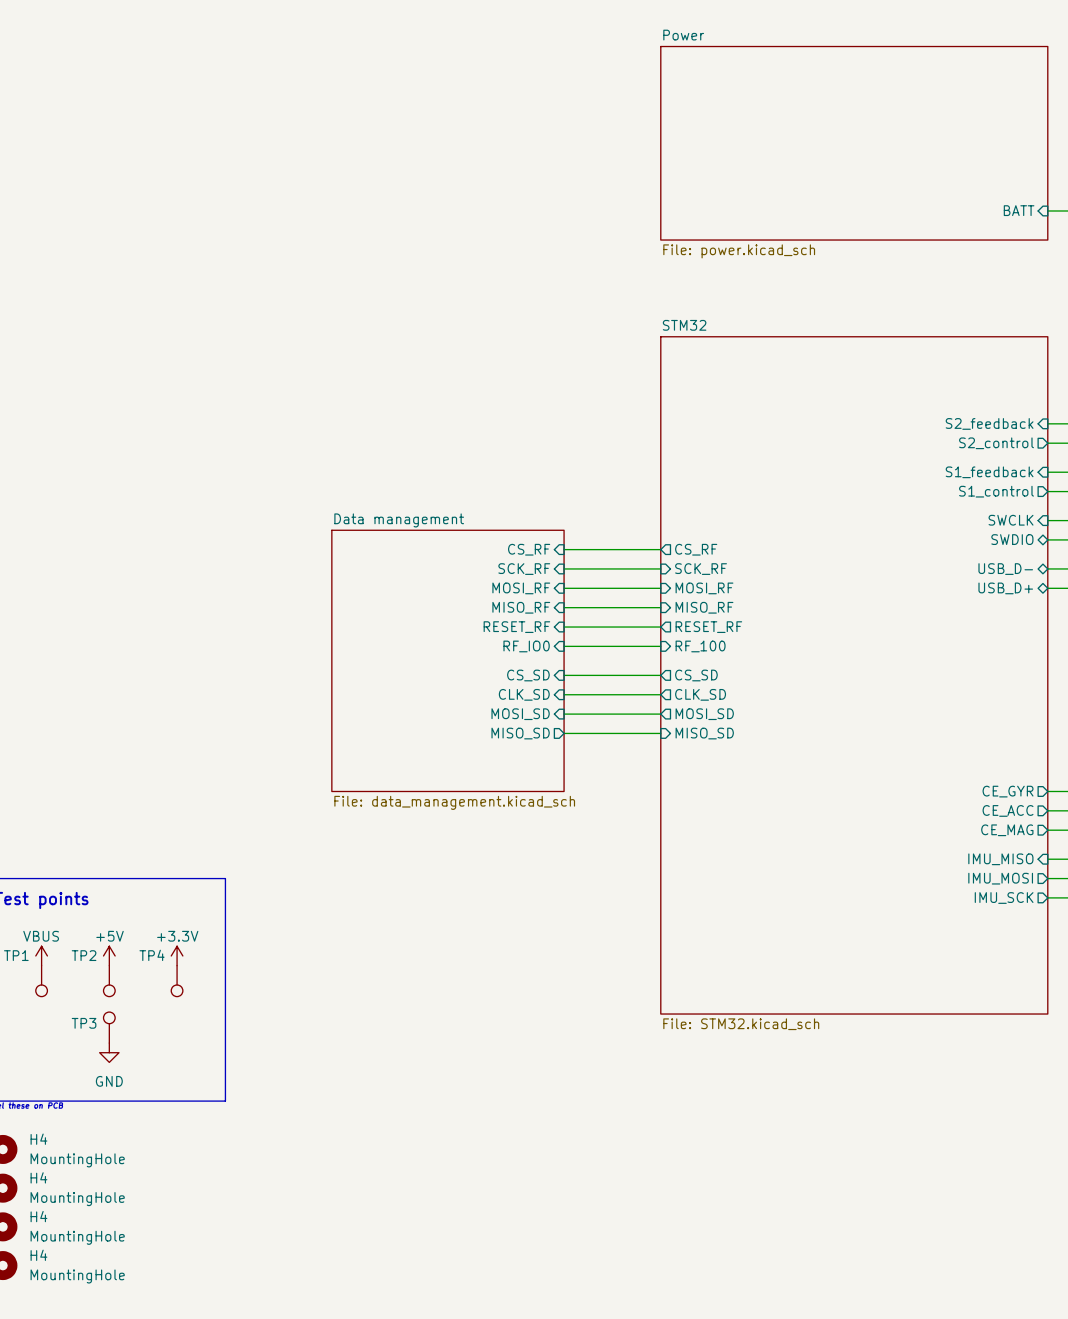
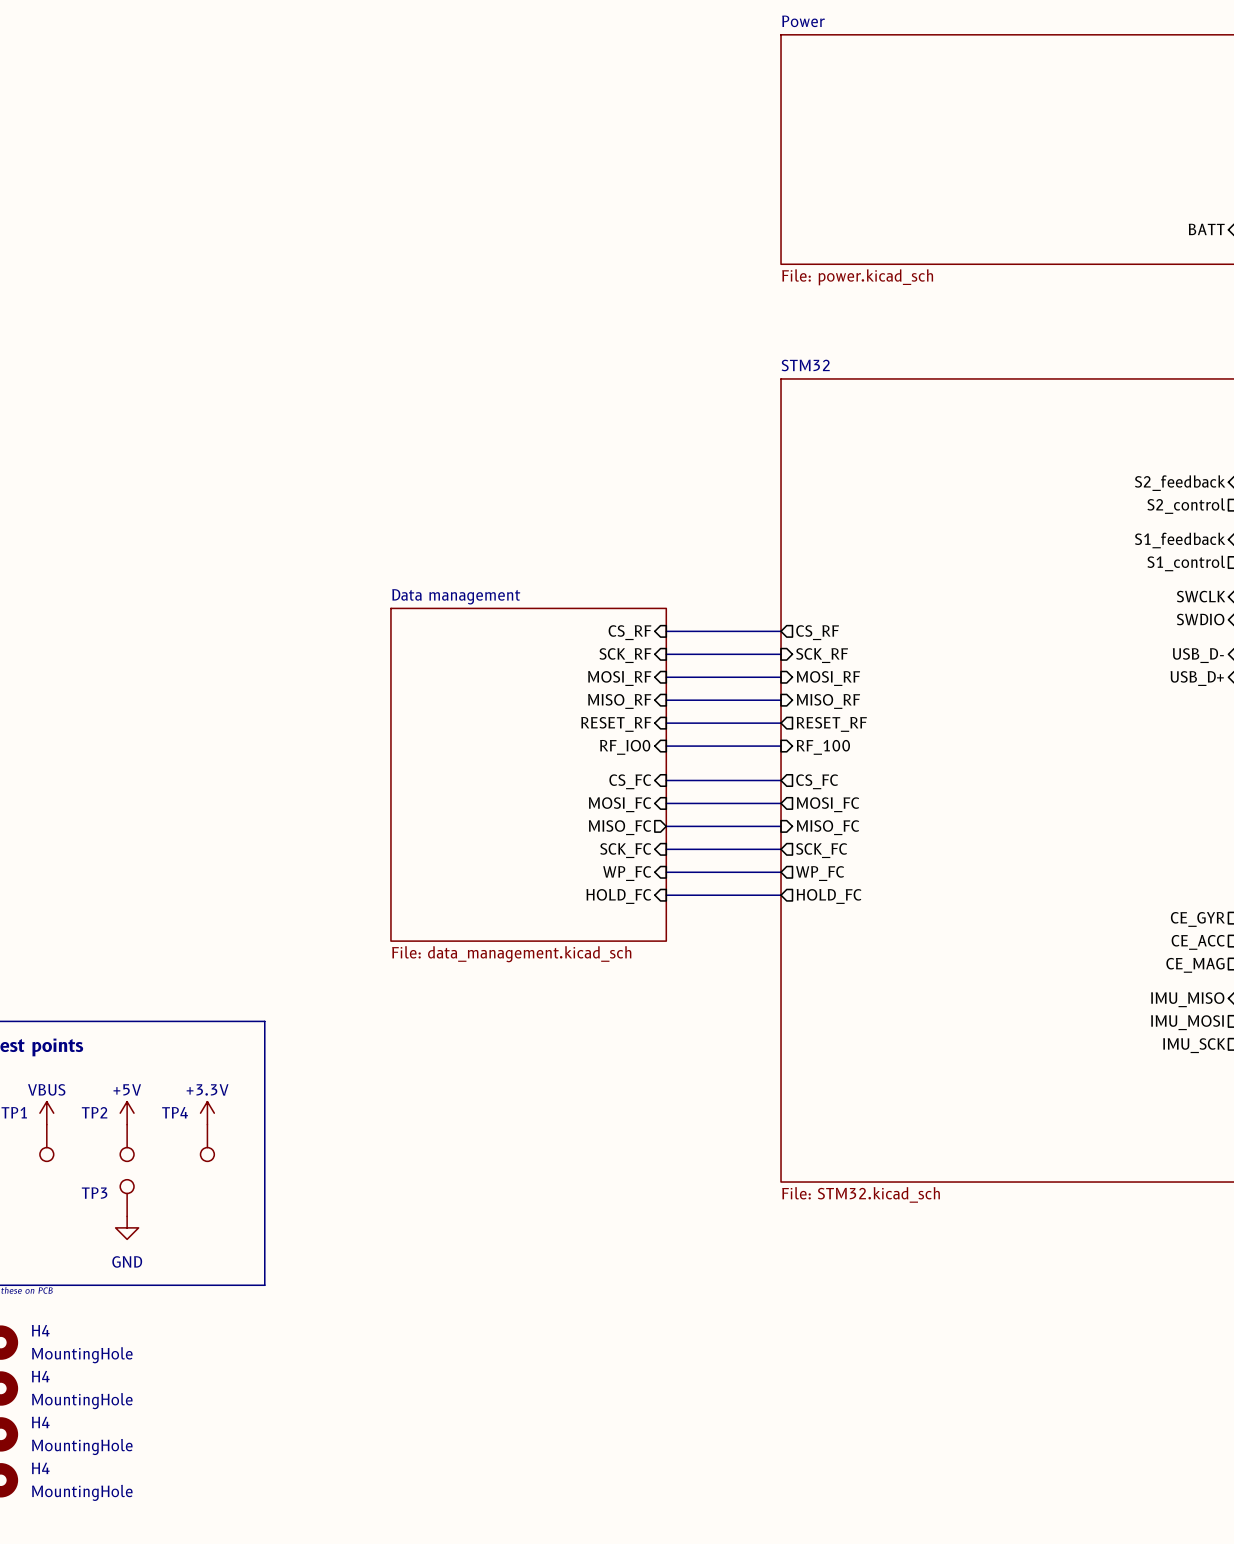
sheet Data management: File: data_management.kicad_sch (447, 660) -> none
sheet Data management: none -> File: data_management.kicad_sch (528, 774)
sheet pin: CS_SD (528, 675) -> CS_FC (630, 781)
sheet pin: CS_SD (696, 675) -> CS_FC (817, 781)
sheet pin: CLK_SD (524, 694) -> MOSI_FC (620, 804)
sheet pin: CLK_SD (700, 694) -> MOSI_FC (828, 804)
sheet pin shape: input (520, 714) -> output (620, 827)
sheet pin: MOSI_SD (520, 714) -> MISO_FC (620, 827)
sheet pin shape: output (704, 714) -> input (828, 827)
sheet pin: MOSI_SD (704, 714) -> MISO_FC (828, 827)
sheet pin shape: output (520, 733) -> input (625, 850)
sheet pin: MISO_SD (520, 733) -> SCK_FC (625, 850)
sheet pin shape: input (704, 733) -> output (821, 850)
sheet pin: MISO_SD (704, 733) -> SCK_FC (821, 850)
sheet pin: none -> WP_FC (627, 873)
wire: none -> (666, 872) (781, 872)
sheet pin: none -> WP_FC (820, 873)
sheet pin: none -> HOLD_FC (618, 896)
wire: none -> (666, 895) (781, 895)
sheet pin: none -> HOLD_FC (829, 896)

